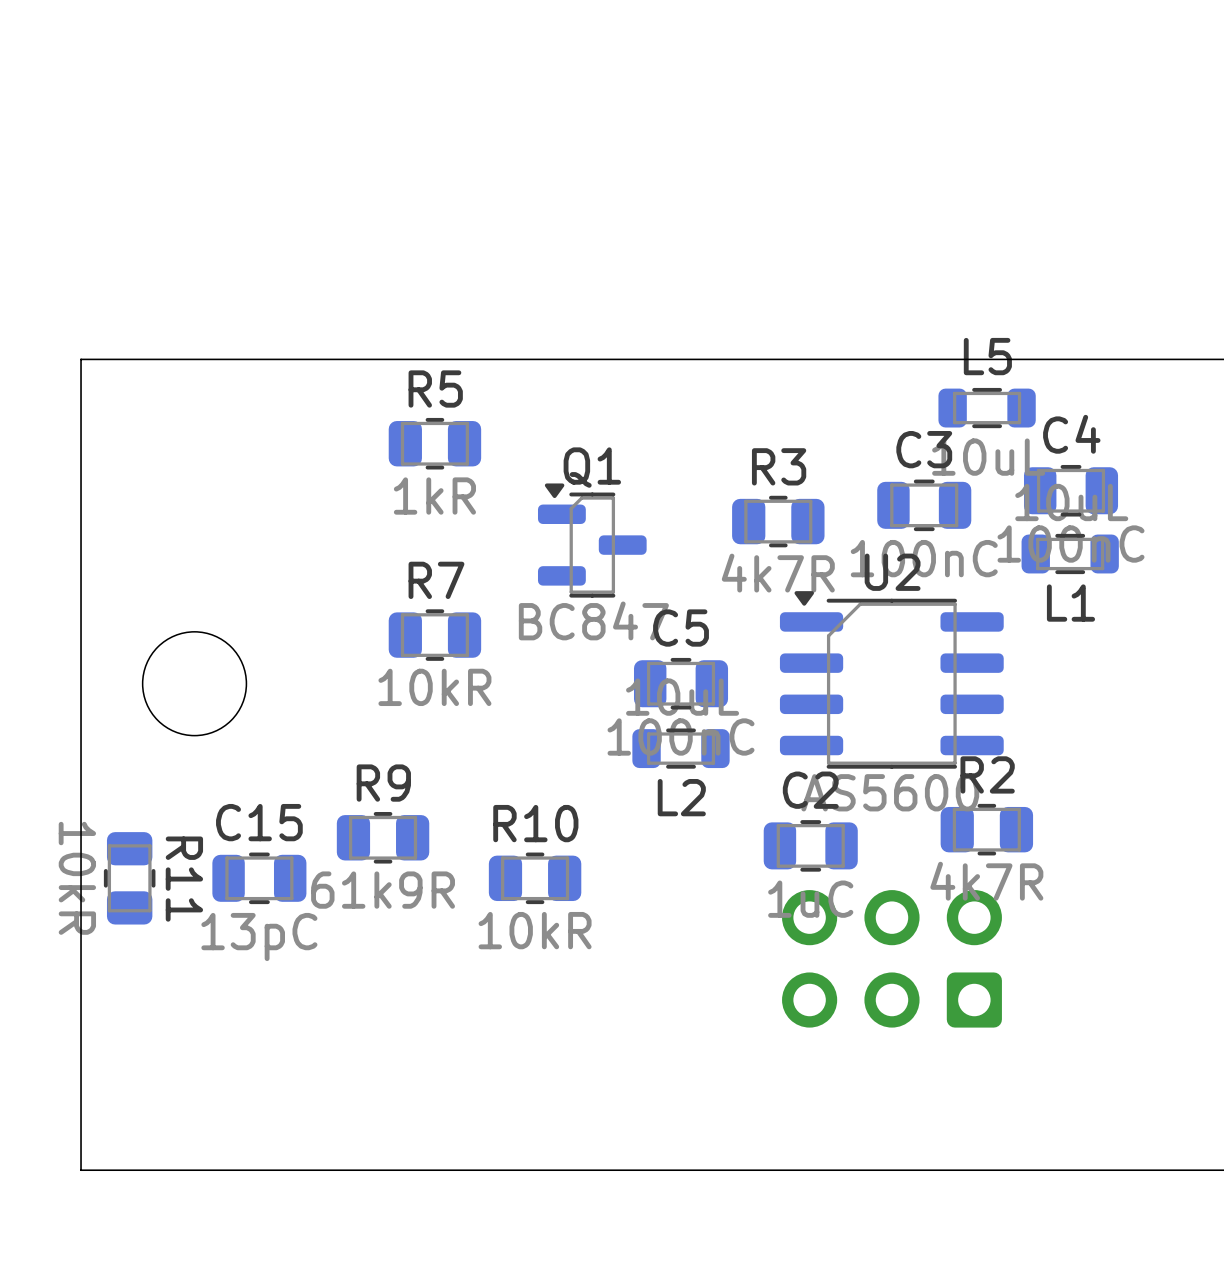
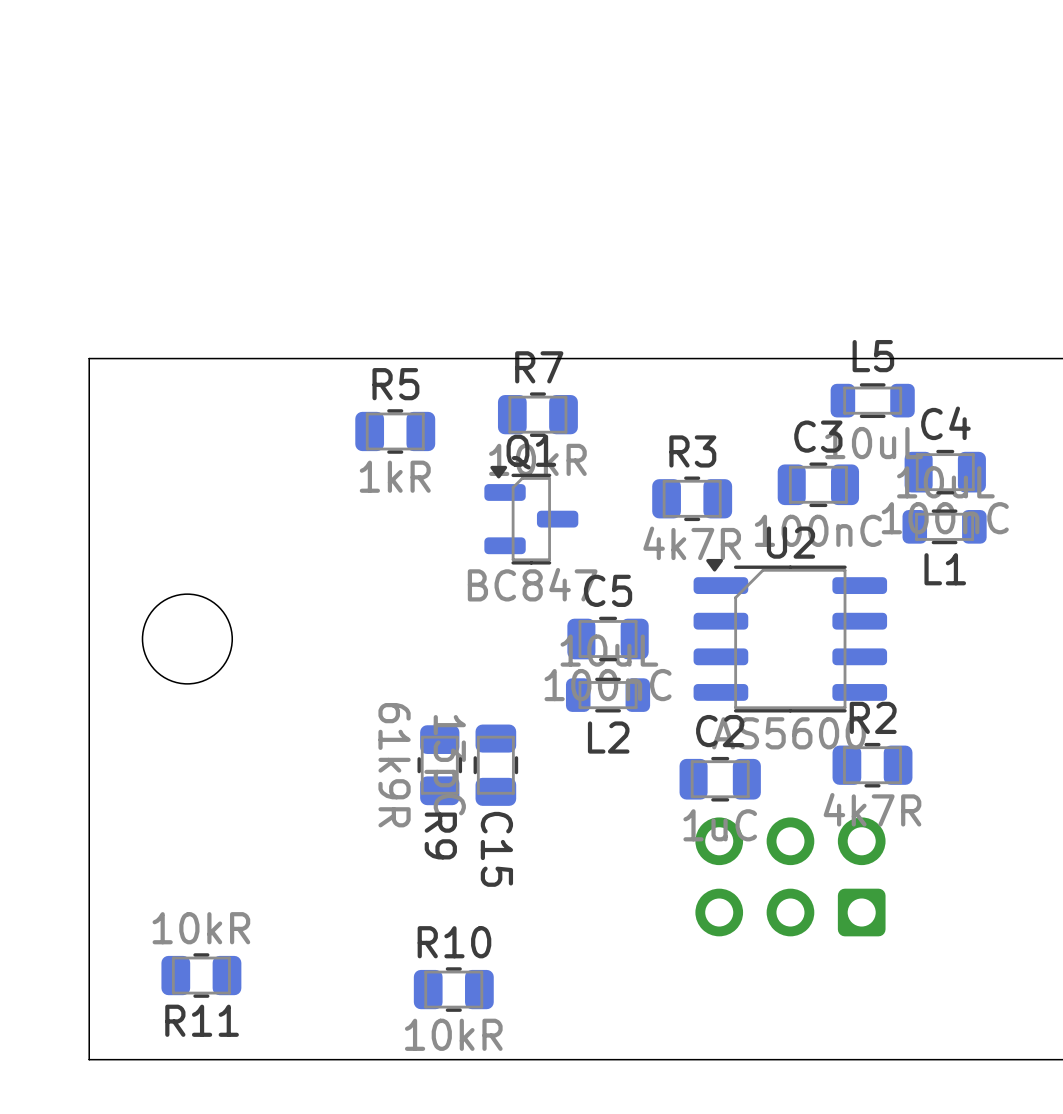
R7 position: (434, 635) -> (537, 414)
R9 name position: R9 (383, 783) -> R9 (440, 835)
C15 name position: C15 (259, 822) -> C15 (496, 849)
R9 rotation: 0° (383, 837) -> 90° clockwise (439, 765)
R9 position: (383, 837) -> (439, 765)
R11 rotation: 0° (129, 878) -> 90° clockwise (201, 975)
R11 position: (129, 878) -> (201, 975)
C15 rotation: 0° (259, 878) -> 90° clockwise (495, 765)
C15 position: (259, 878) -> (495, 765)
R10 position: (535, 878) -> (453, 989)

